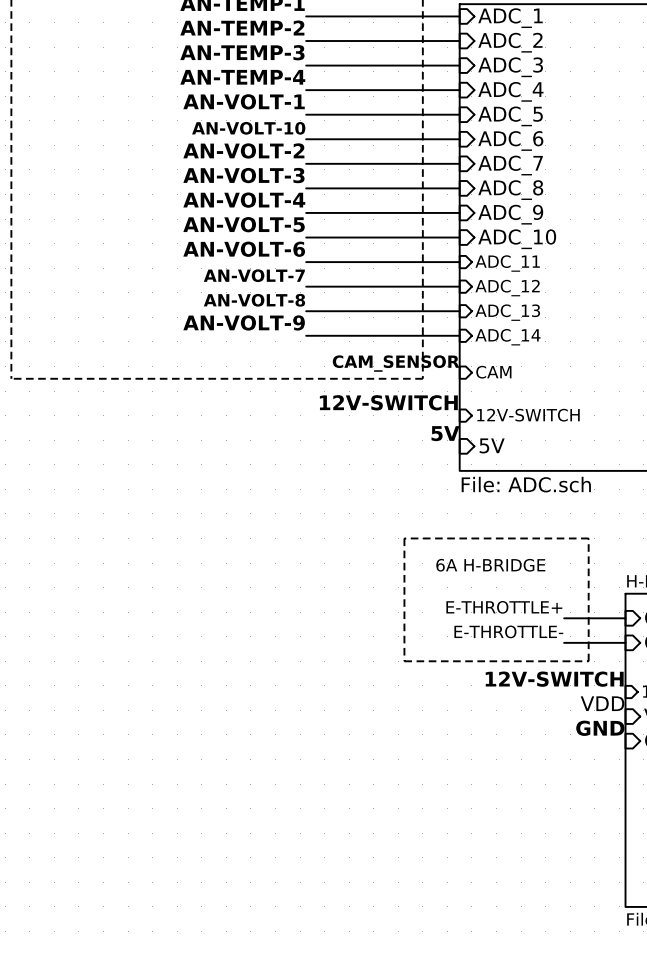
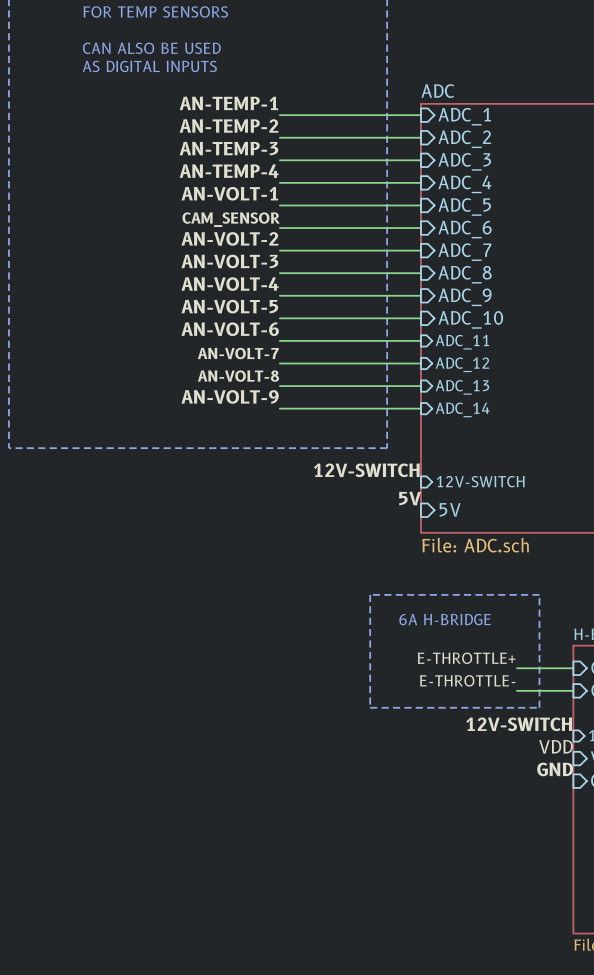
label: AN-VOLT-10 (248, 128) -> CAM_SENSOR (231, 219)
label: CAM_SENSOR (396, 363) -> none
sheet pin: CAM (493, 372) -> none

